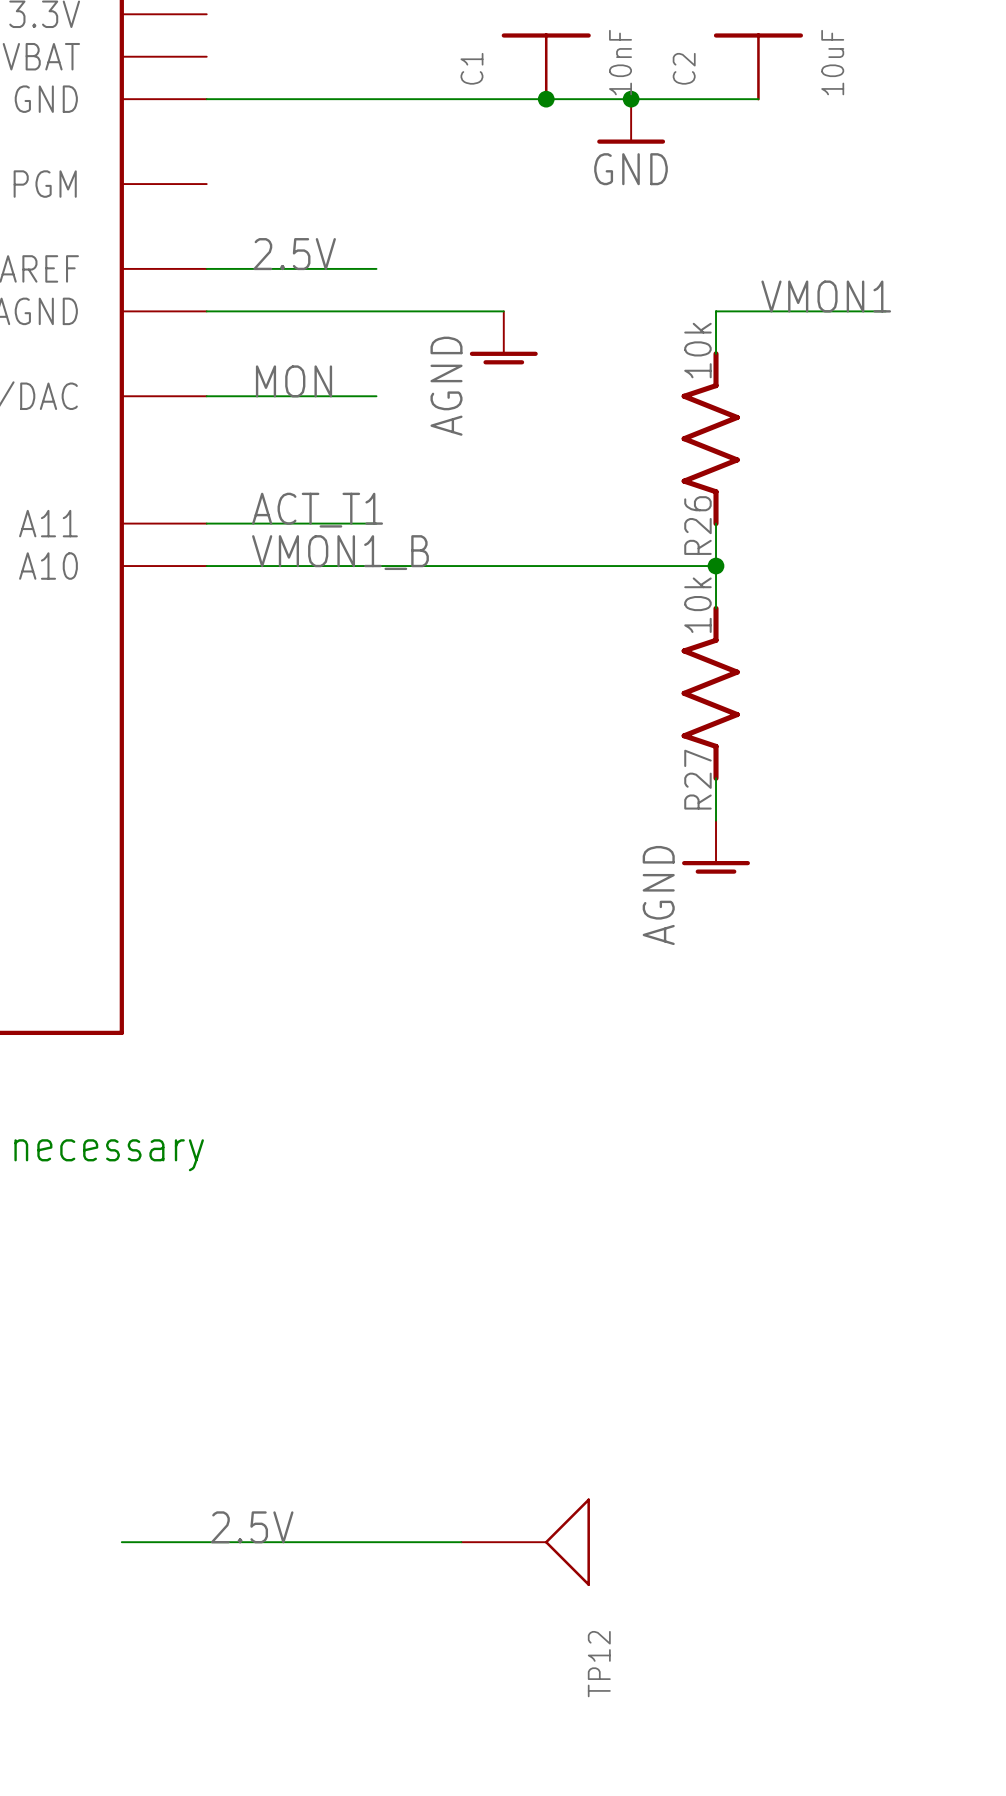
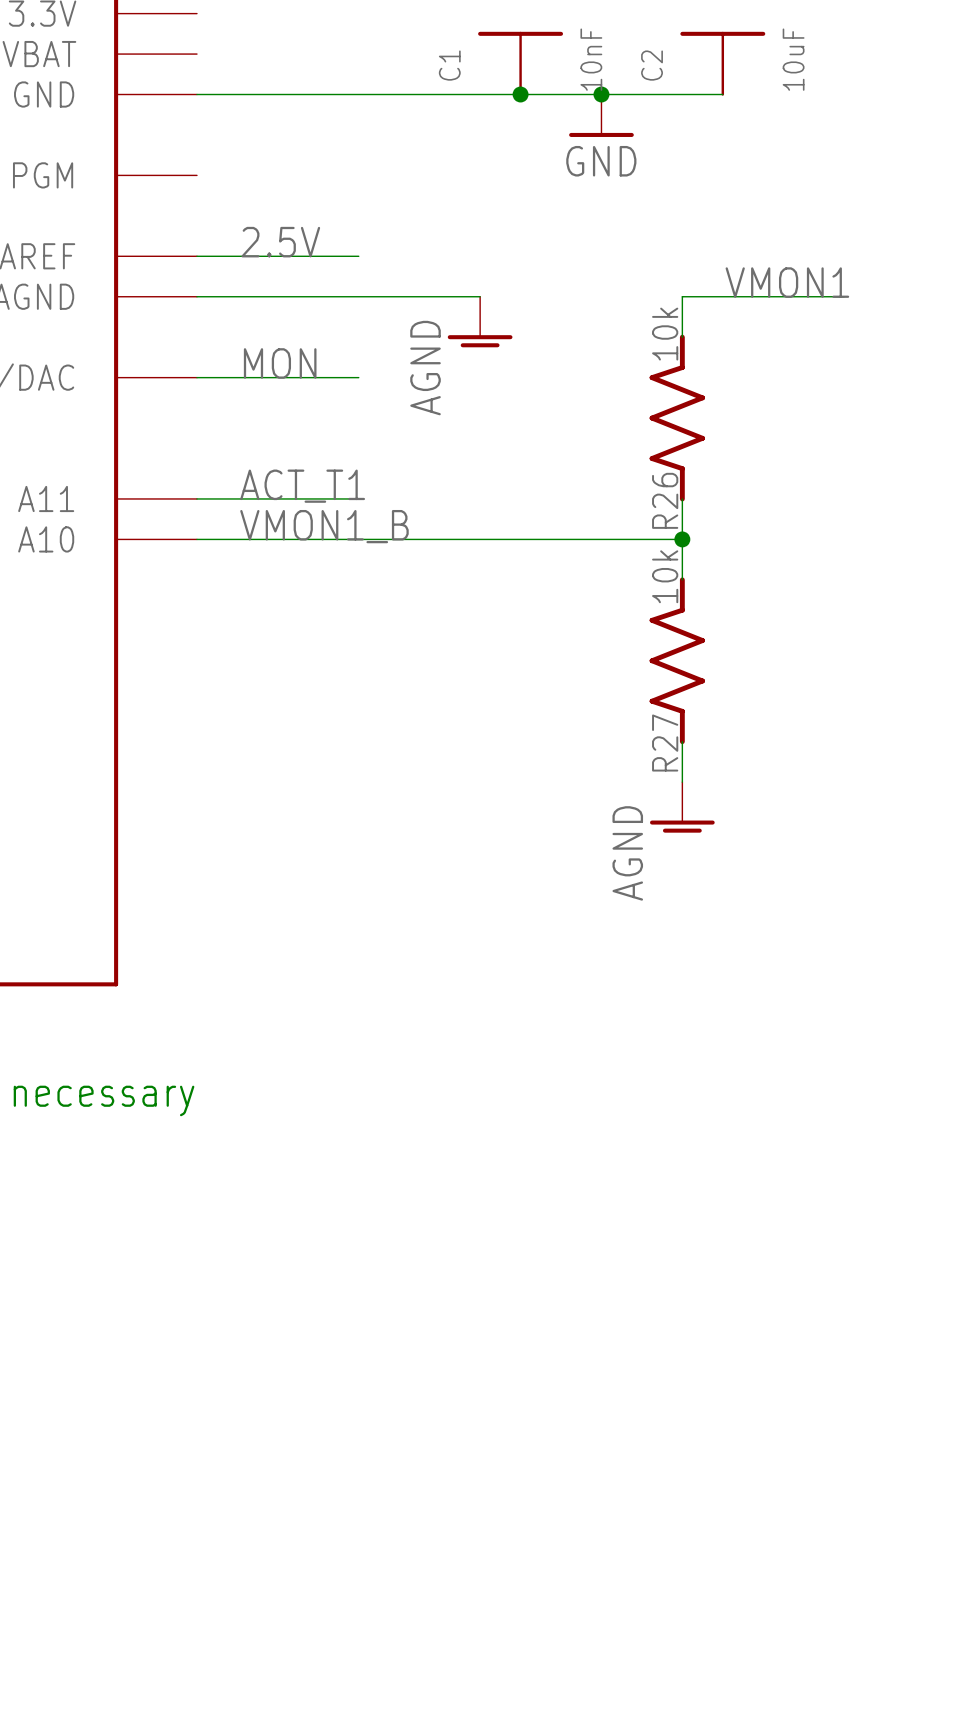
label: 2.5V (252, 1527) -> none
wire: (121, 1542) (461, 1542) -> none
TP12: (525, 1542) -> none

